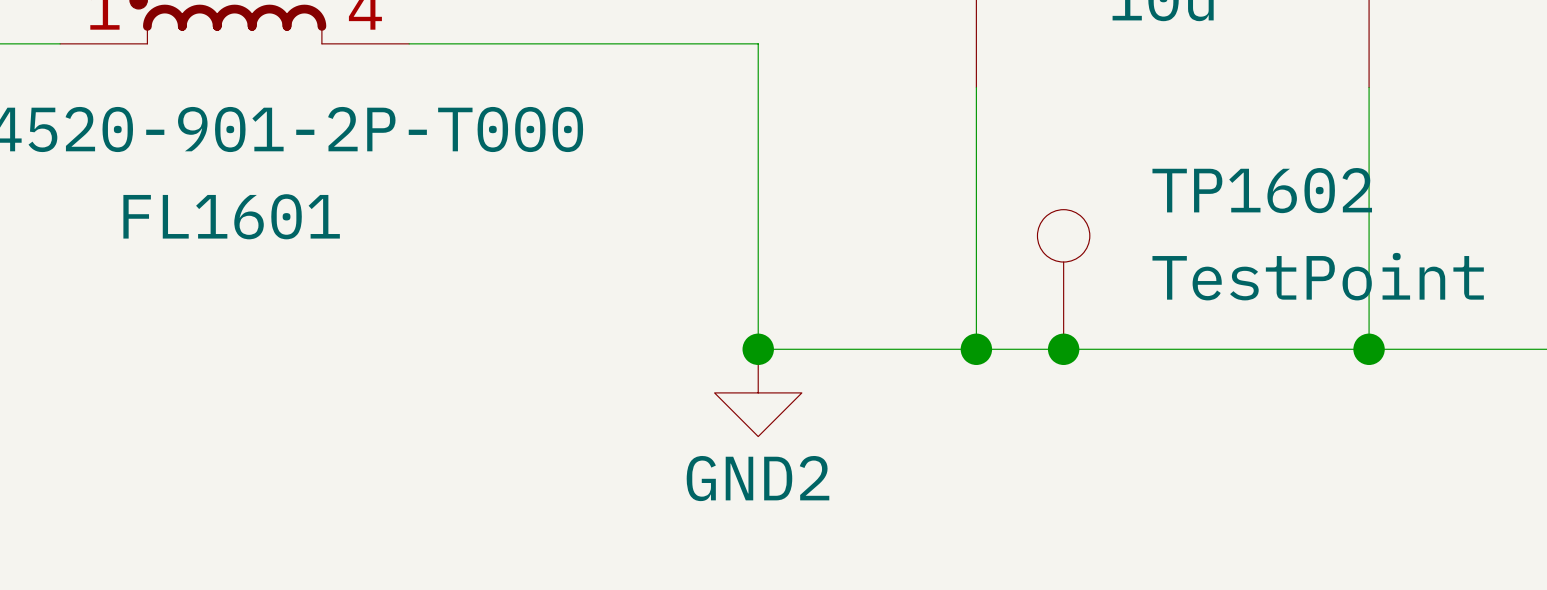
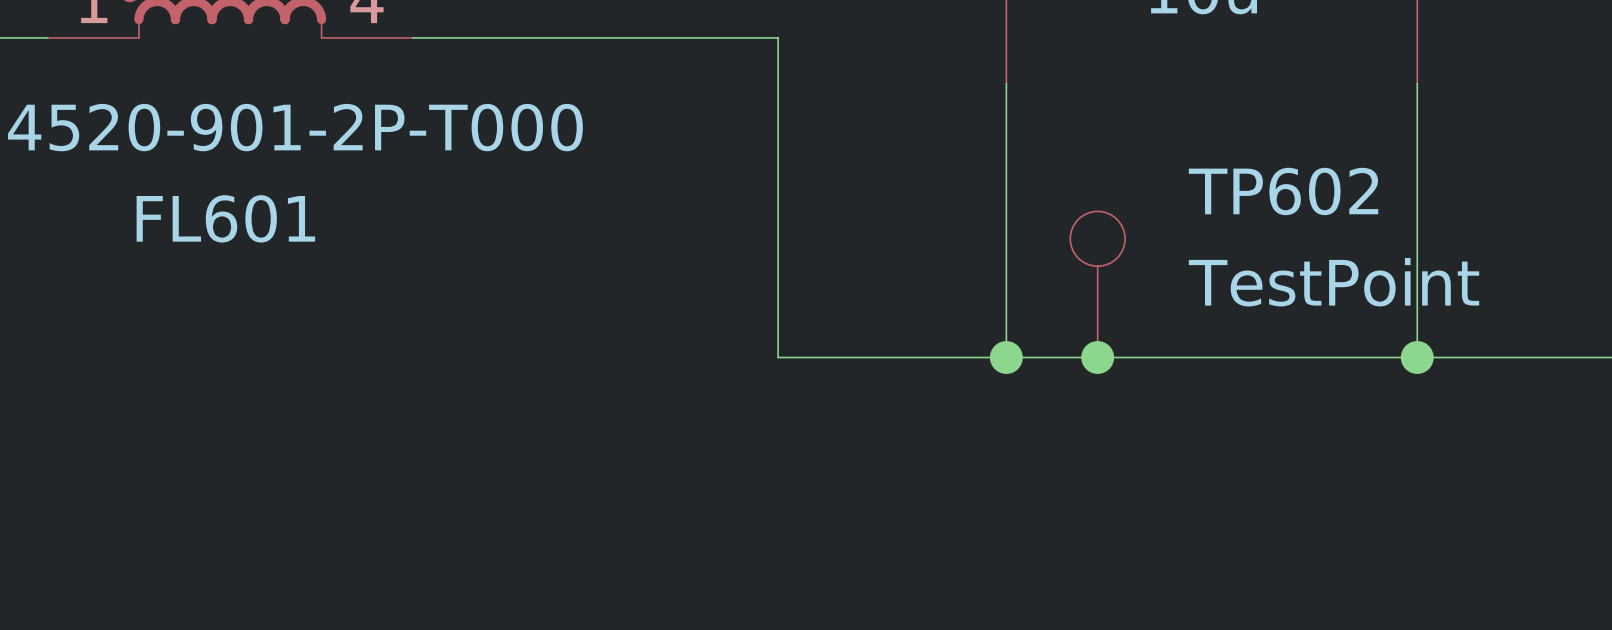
TP1602 name: TP1602 (1262, 190) -> TP602 (1283, 191)
FL1601 name: FL1601 (231, 216) -> FL601 (225, 218)
junction: (758, 349) -> none
power symbol: GND2 (758, 392) -> none

